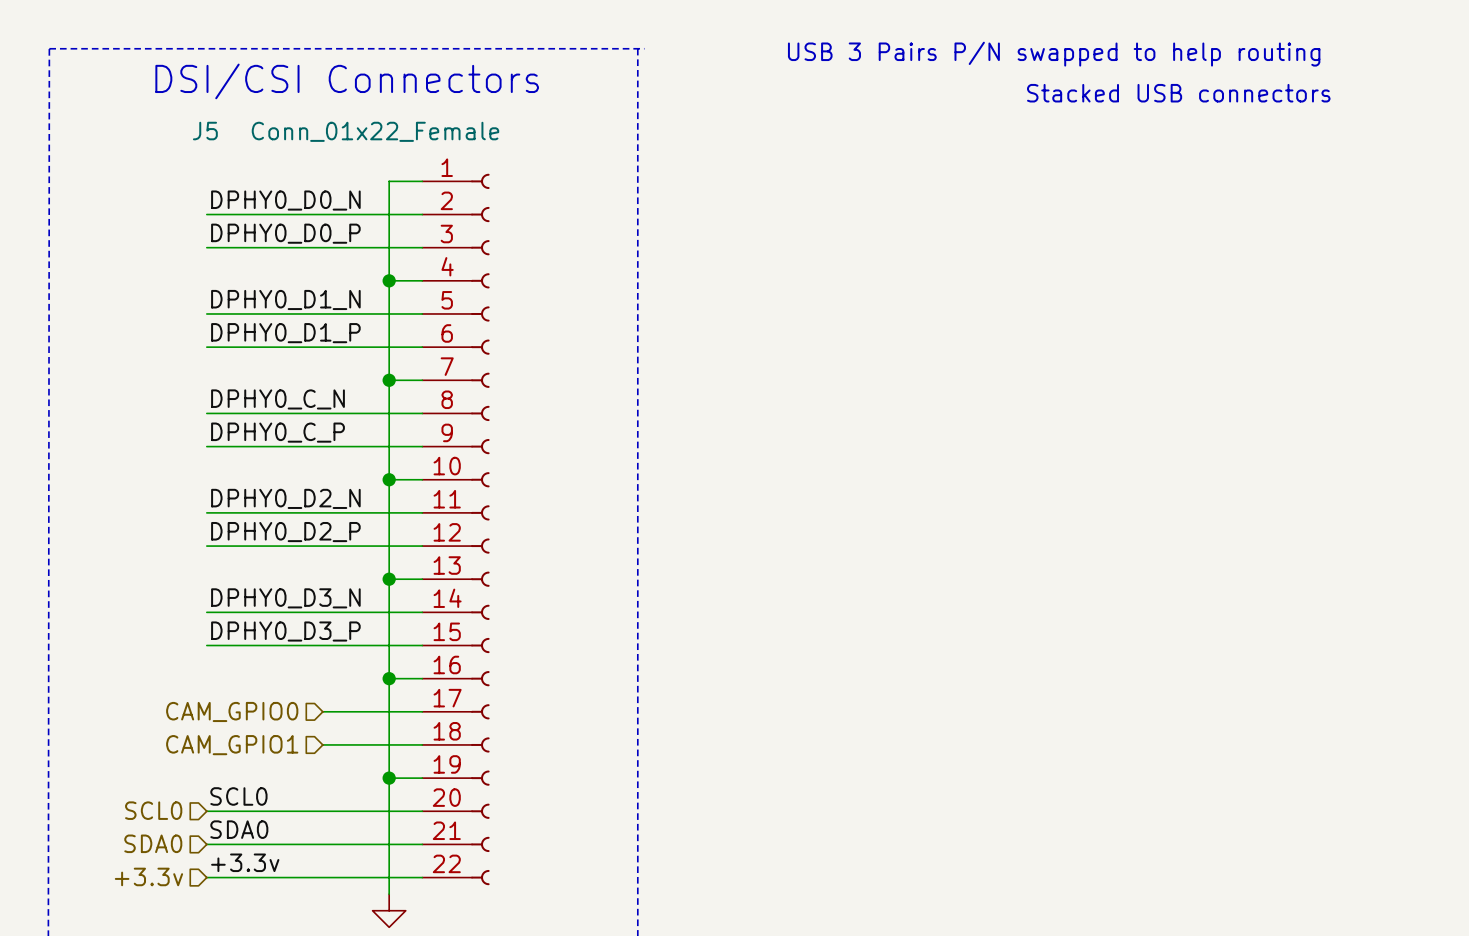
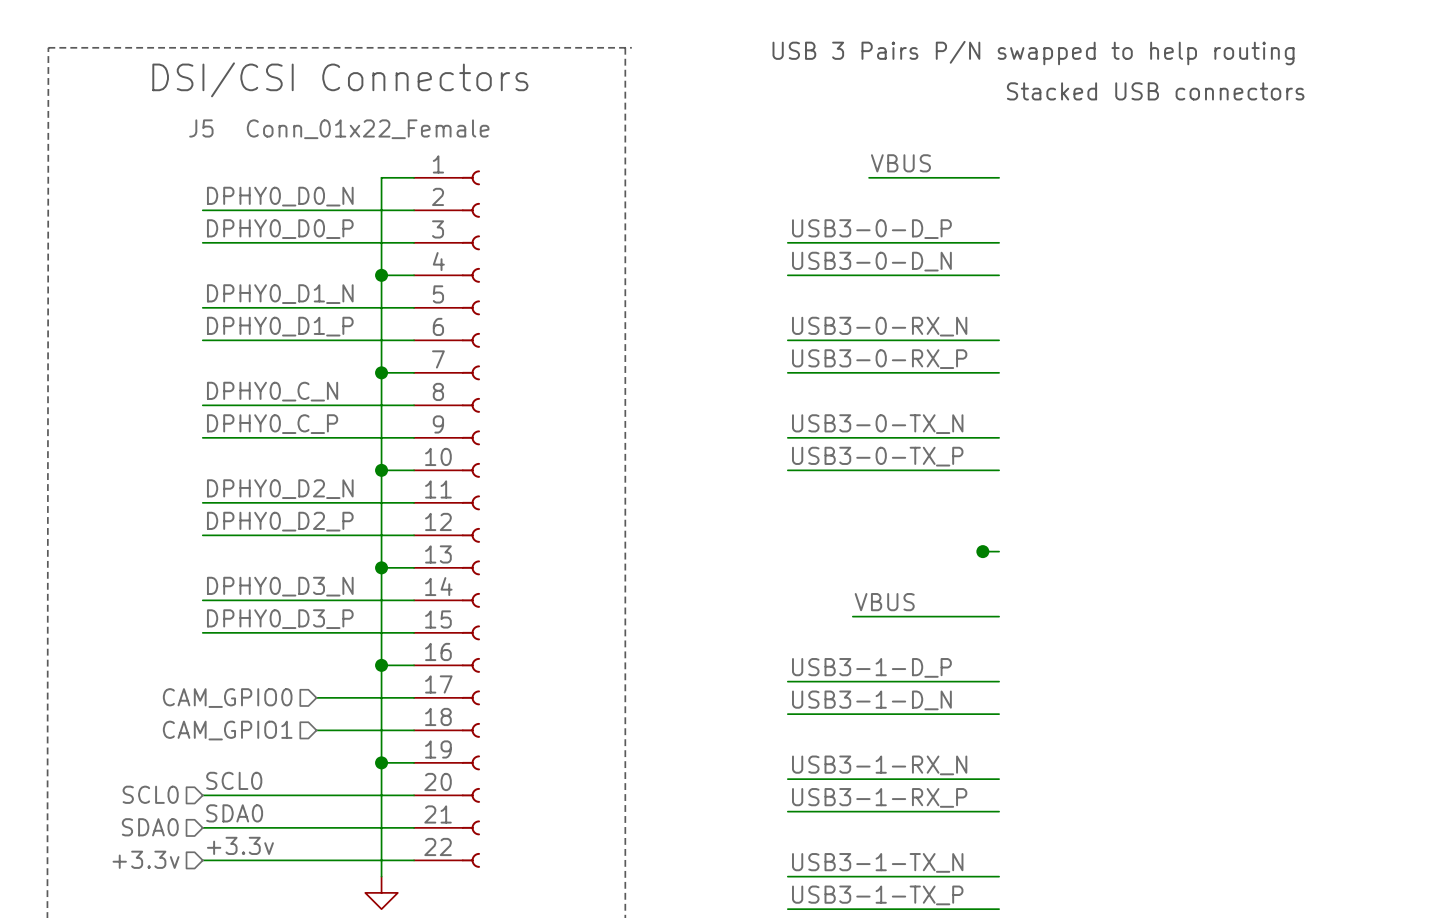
label: none -> VBUS (900, 163)
wire: none -> (869, 177) (999, 177)
label: none -> USB3-0-D_P (871, 229)
wire: none -> (787, 242) (999, 242)
label: none -> USB3-0-D_N (871, 261)
wire: none -> (787, 275) (999, 275)
label: none -> USB3-0-RX_N (879, 326)
wire: none -> (787, 340) (999, 340)
label: none -> USB3-0-RX_P (879, 359)
wire: none -> (787, 372) (999, 372)
label: none -> USB3-0-TX_N (877, 424)
wire: none -> (787, 437) (999, 437)
label: none -> USB3-0-TX_P (877, 456)
wire: none -> (787, 470) (999, 470)
wire: none -> (982, 551) (999, 551)
junction: none -> (982, 551)
label: none -> VBUS (884, 602)
wire: none -> (852, 616) (999, 616)
label: none -> USB3-1-D_P (871, 667)
wire: none -> (787, 681) (999, 681)
label: none -> USB3-1-D_N (871, 700)
wire: none -> (787, 714) (999, 714)
label: none -> USB3-1-RX_N (879, 765)
wire: none -> (787, 779) (999, 779)
label: none -> USB3-1-RX_P (879, 797)
wire: none -> (787, 811) (999, 811)
label: none -> USB3-1-TX_N (877, 862)
wire: none -> (787, 876) (999, 876)
label: none -> USB3-1-TX_P (877, 895)
wire: none -> (787, 909) (999, 909)

